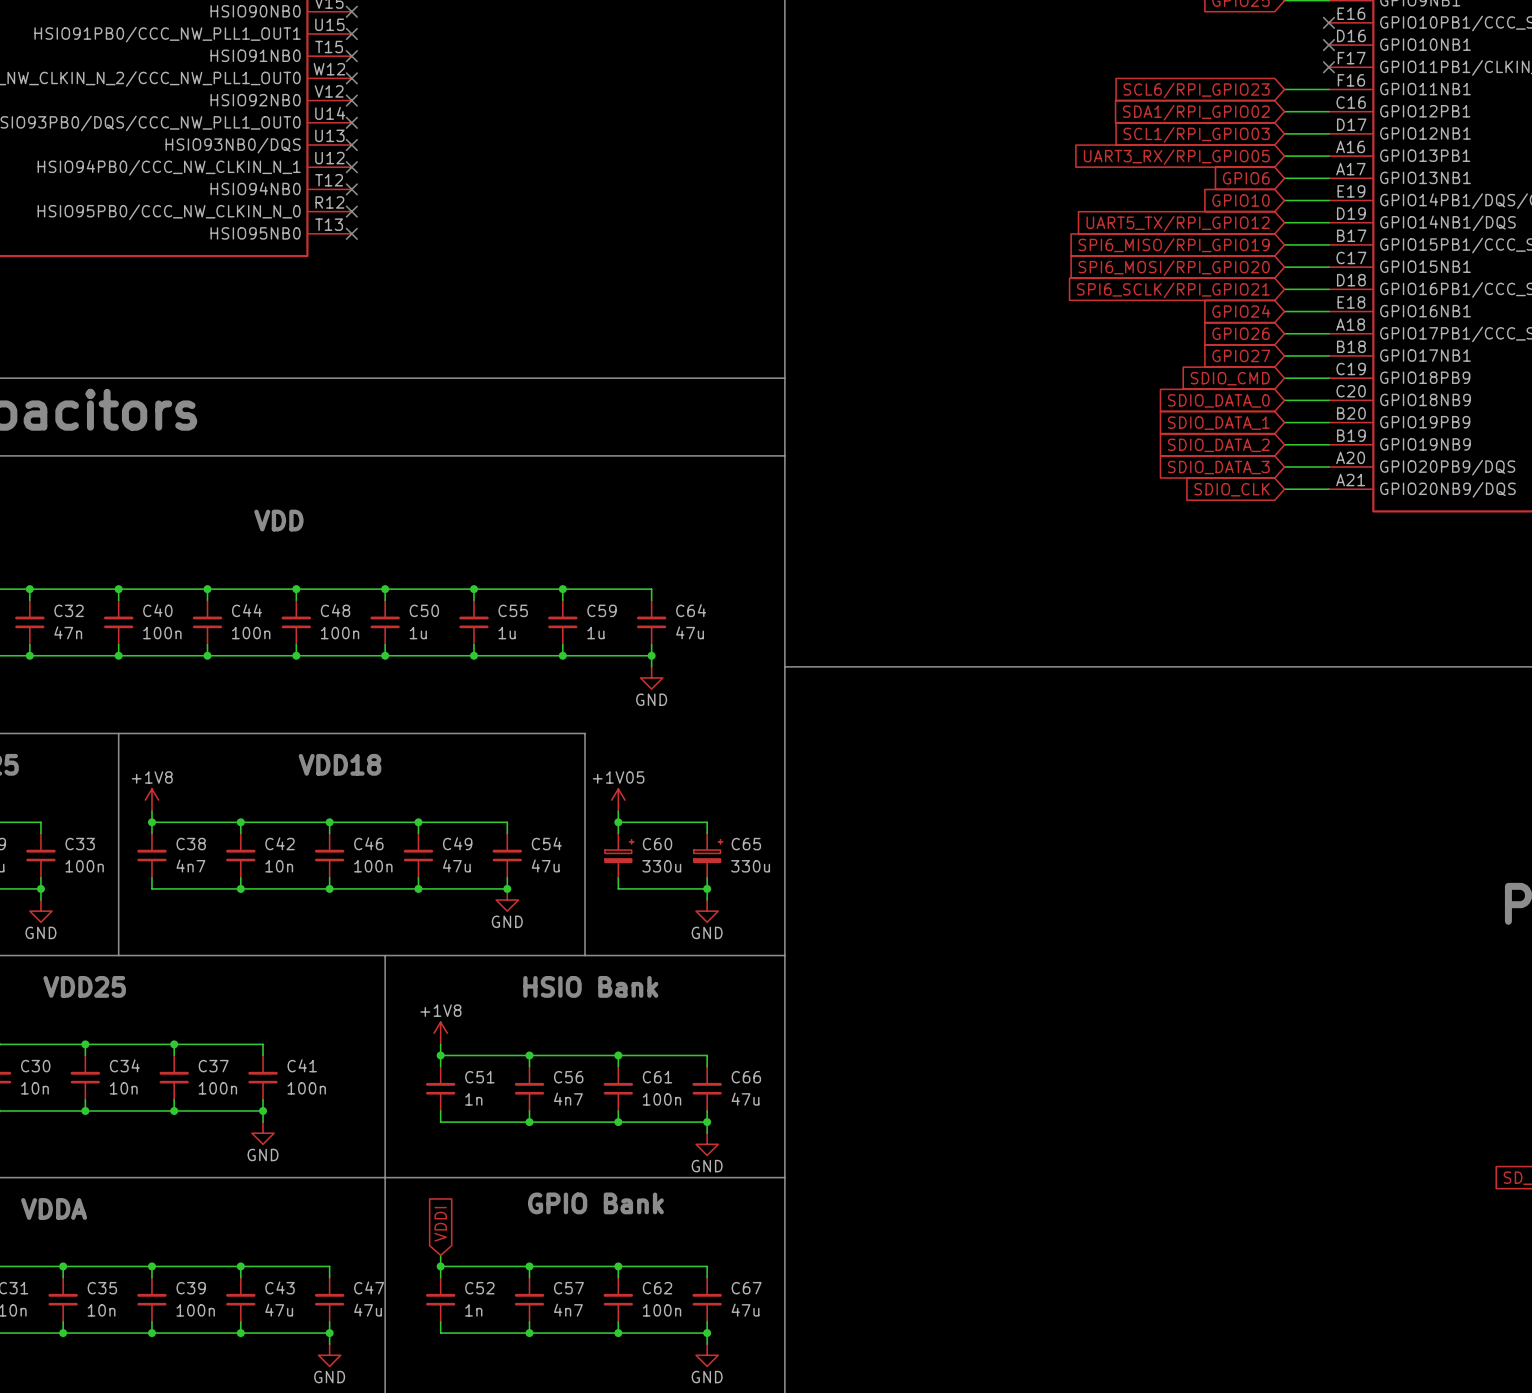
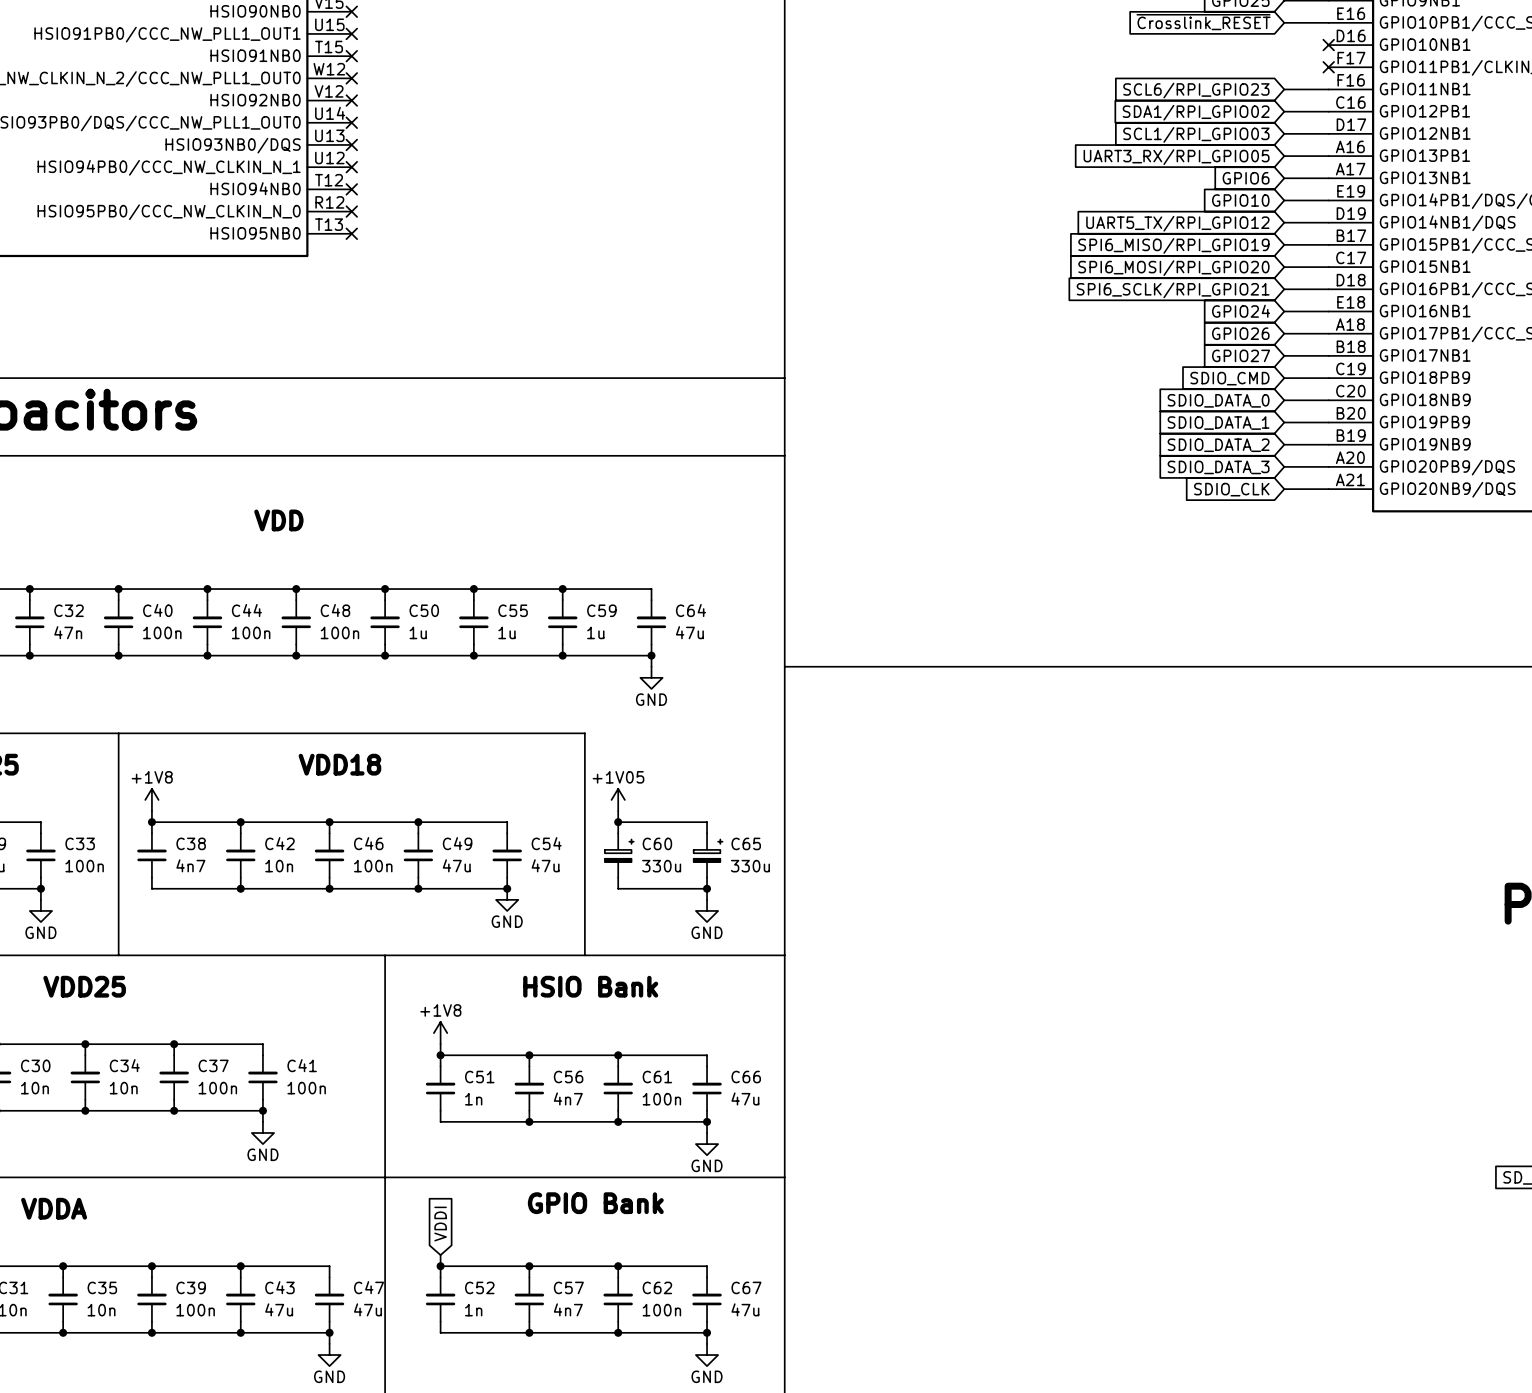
global label: none -> ~{Crosslink_RESET} (1203, 22)
wire: none -> (1284, 22) (1328, 22)
no-connect mark: (1328, 22) -> none

